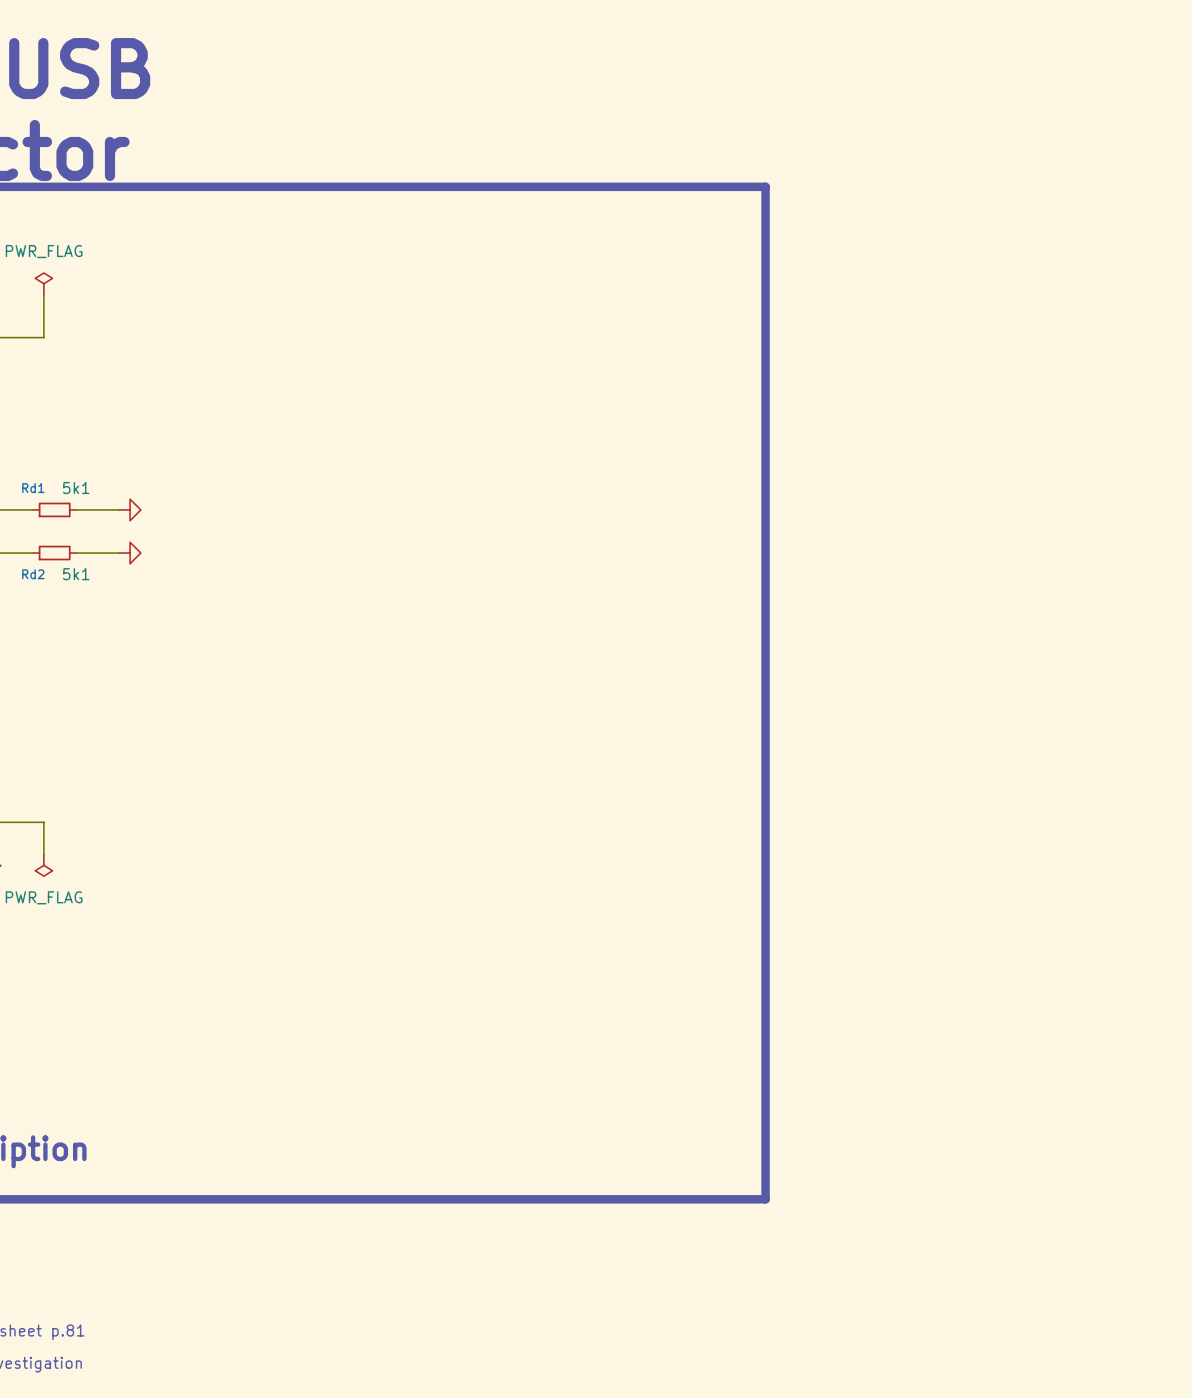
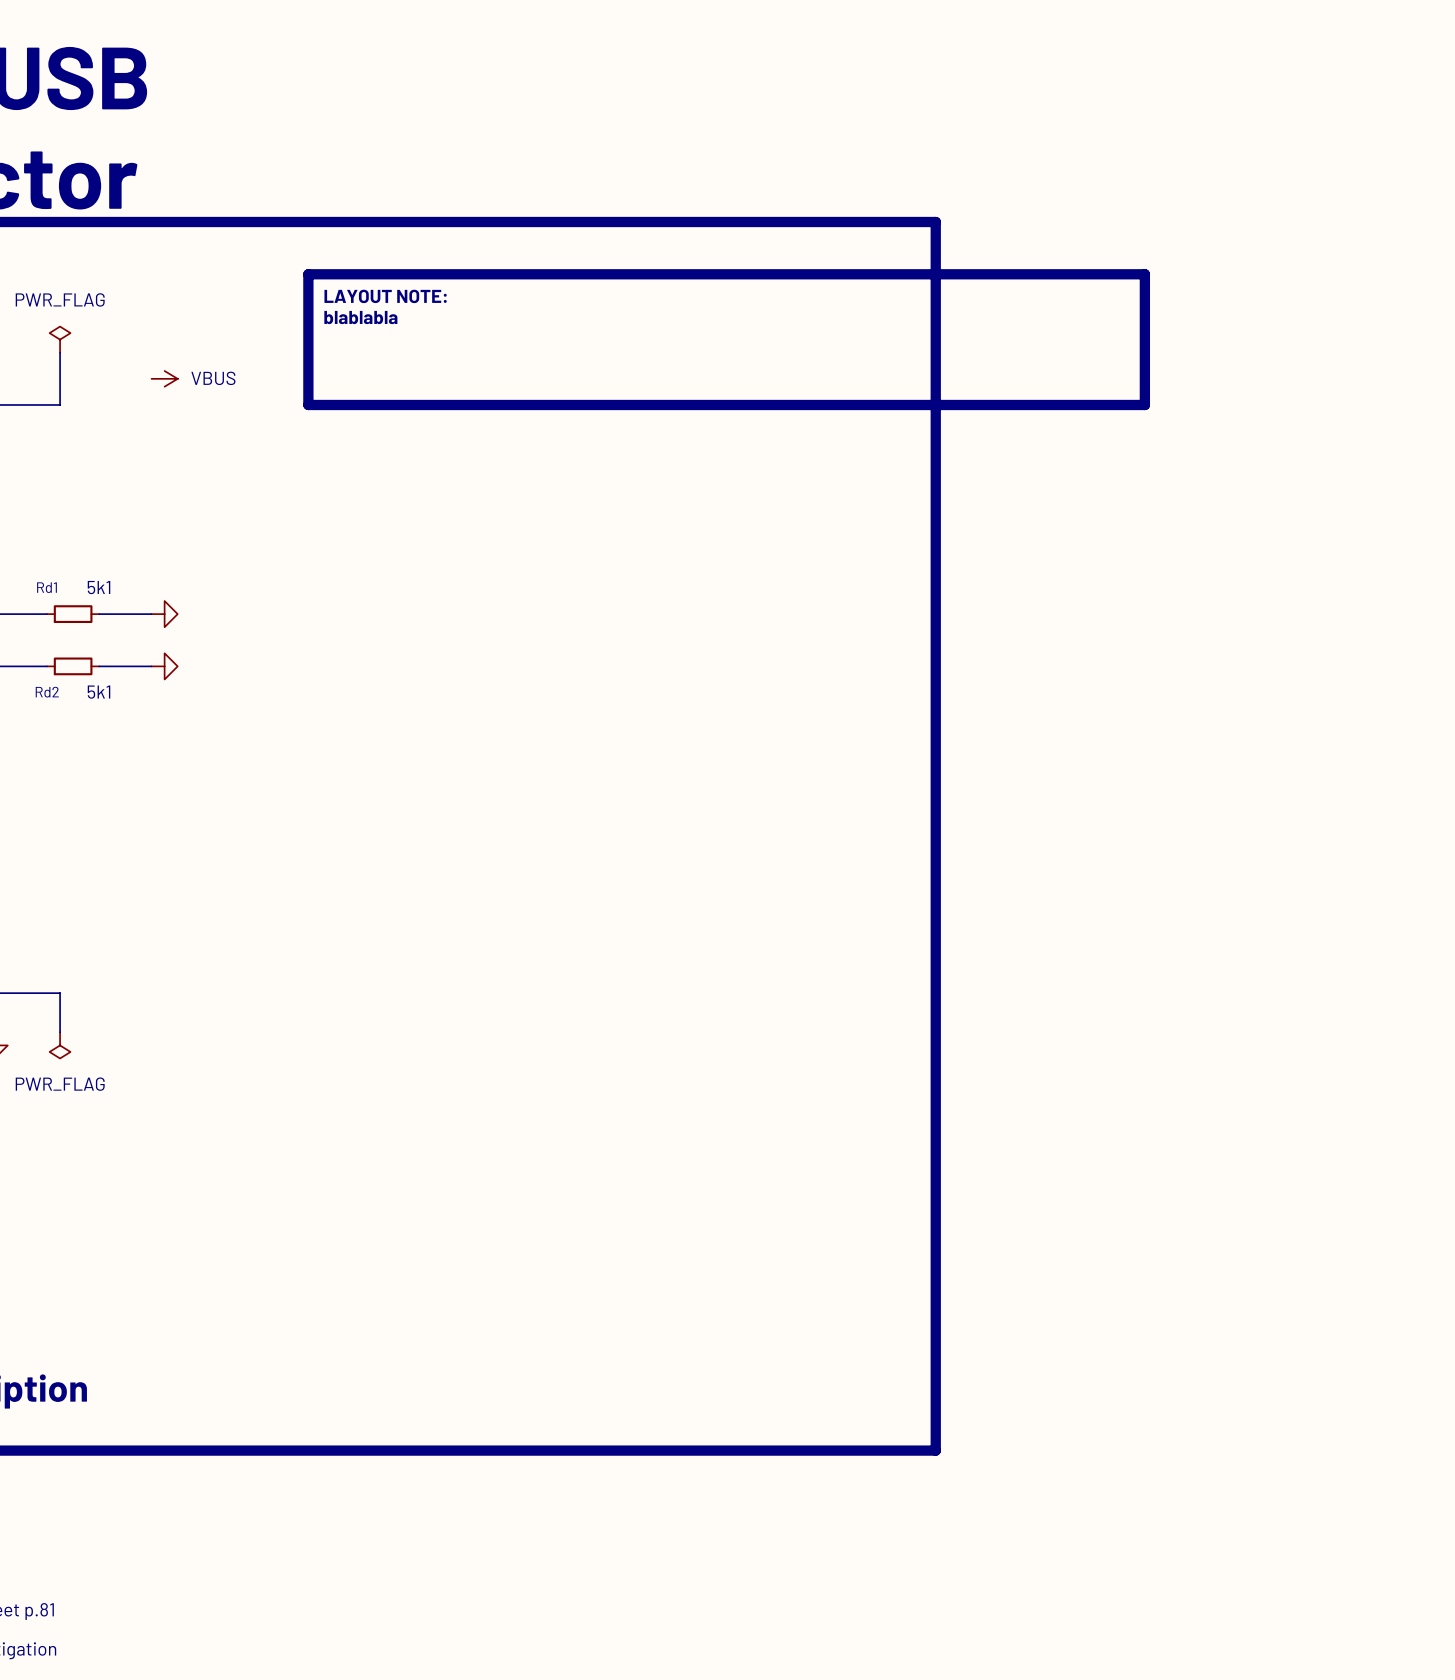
line: none -> (308, 274) (1144, 274) (1144, 404) (308, 404) (308, 274)
text: none -> LAYOUT NOTE: (385, 296)
text: none -> blablabla (360, 317)
power symbol: none -> VBUS (164, 378)

